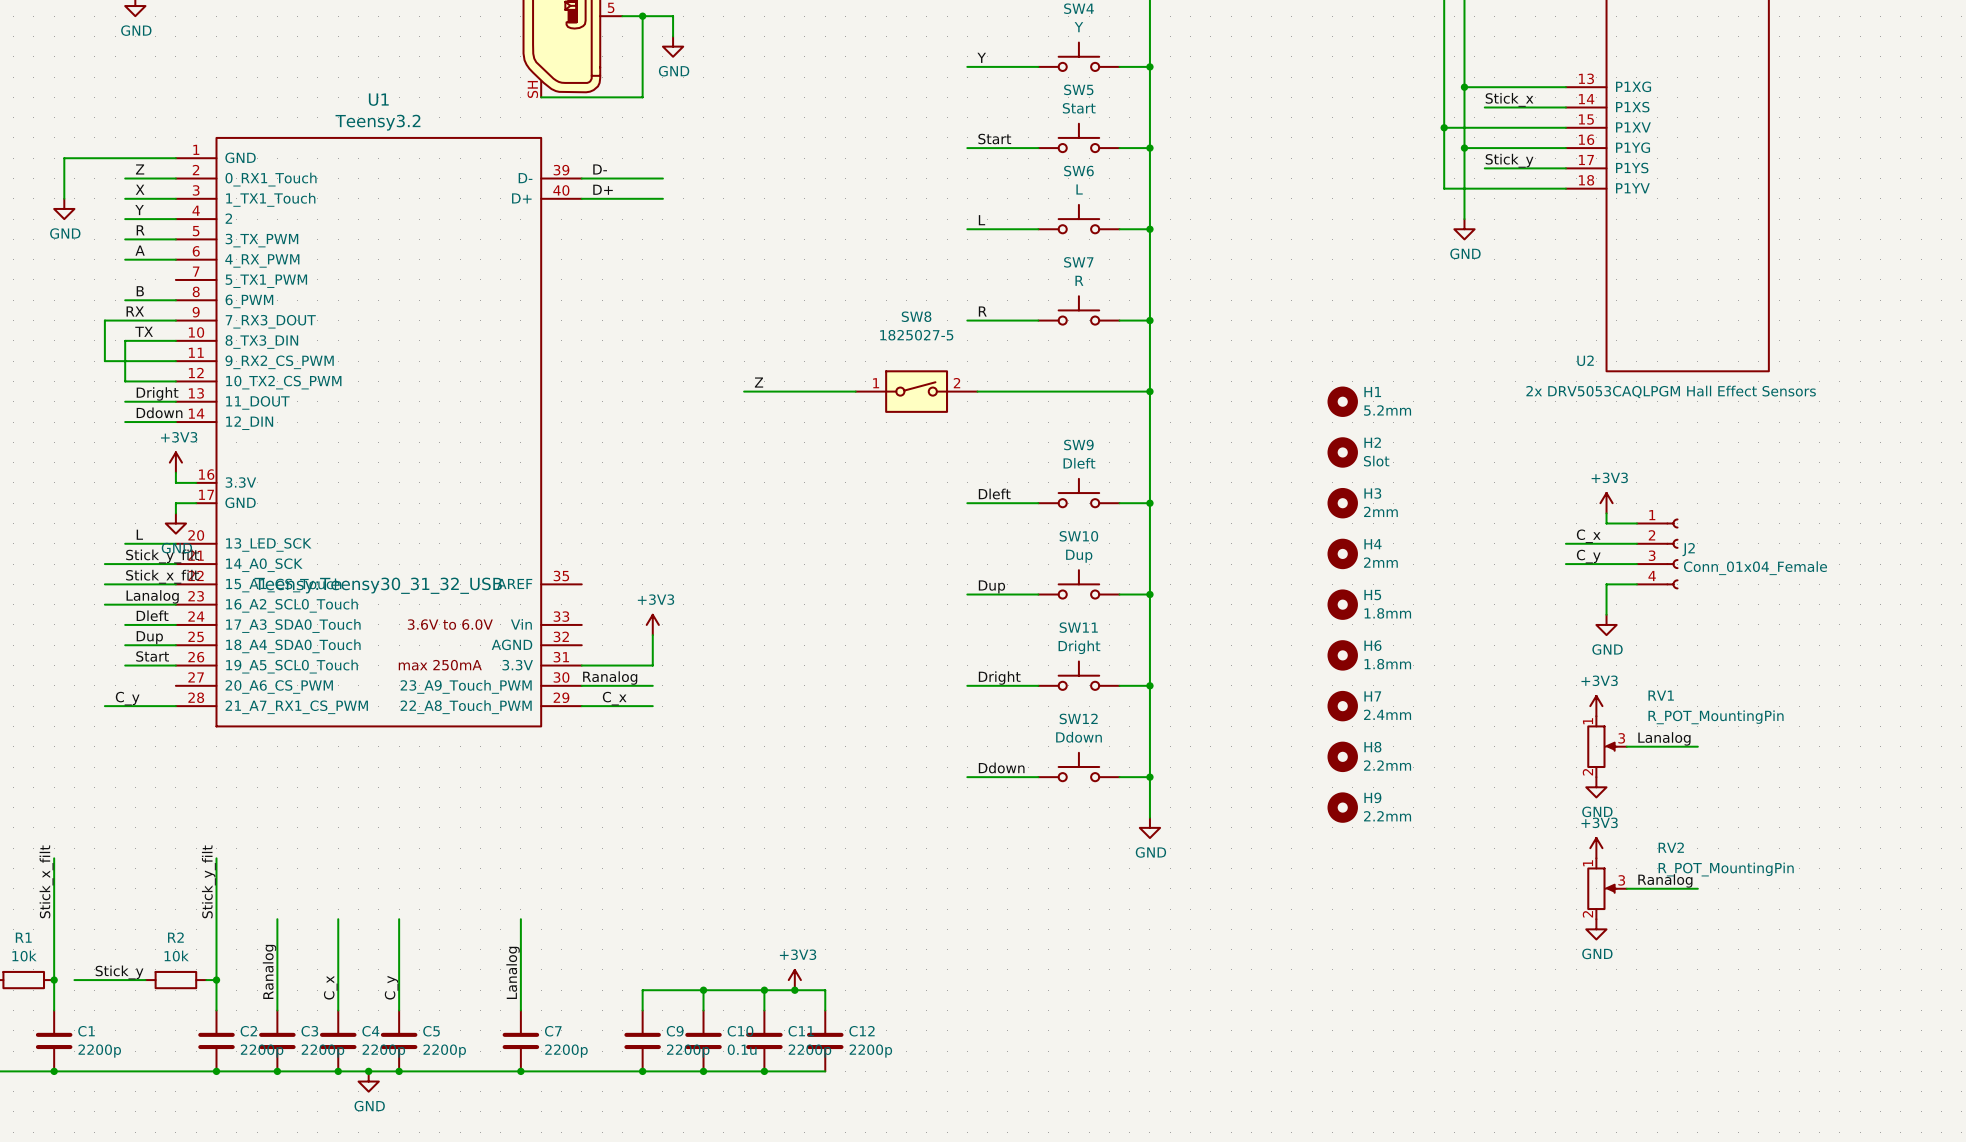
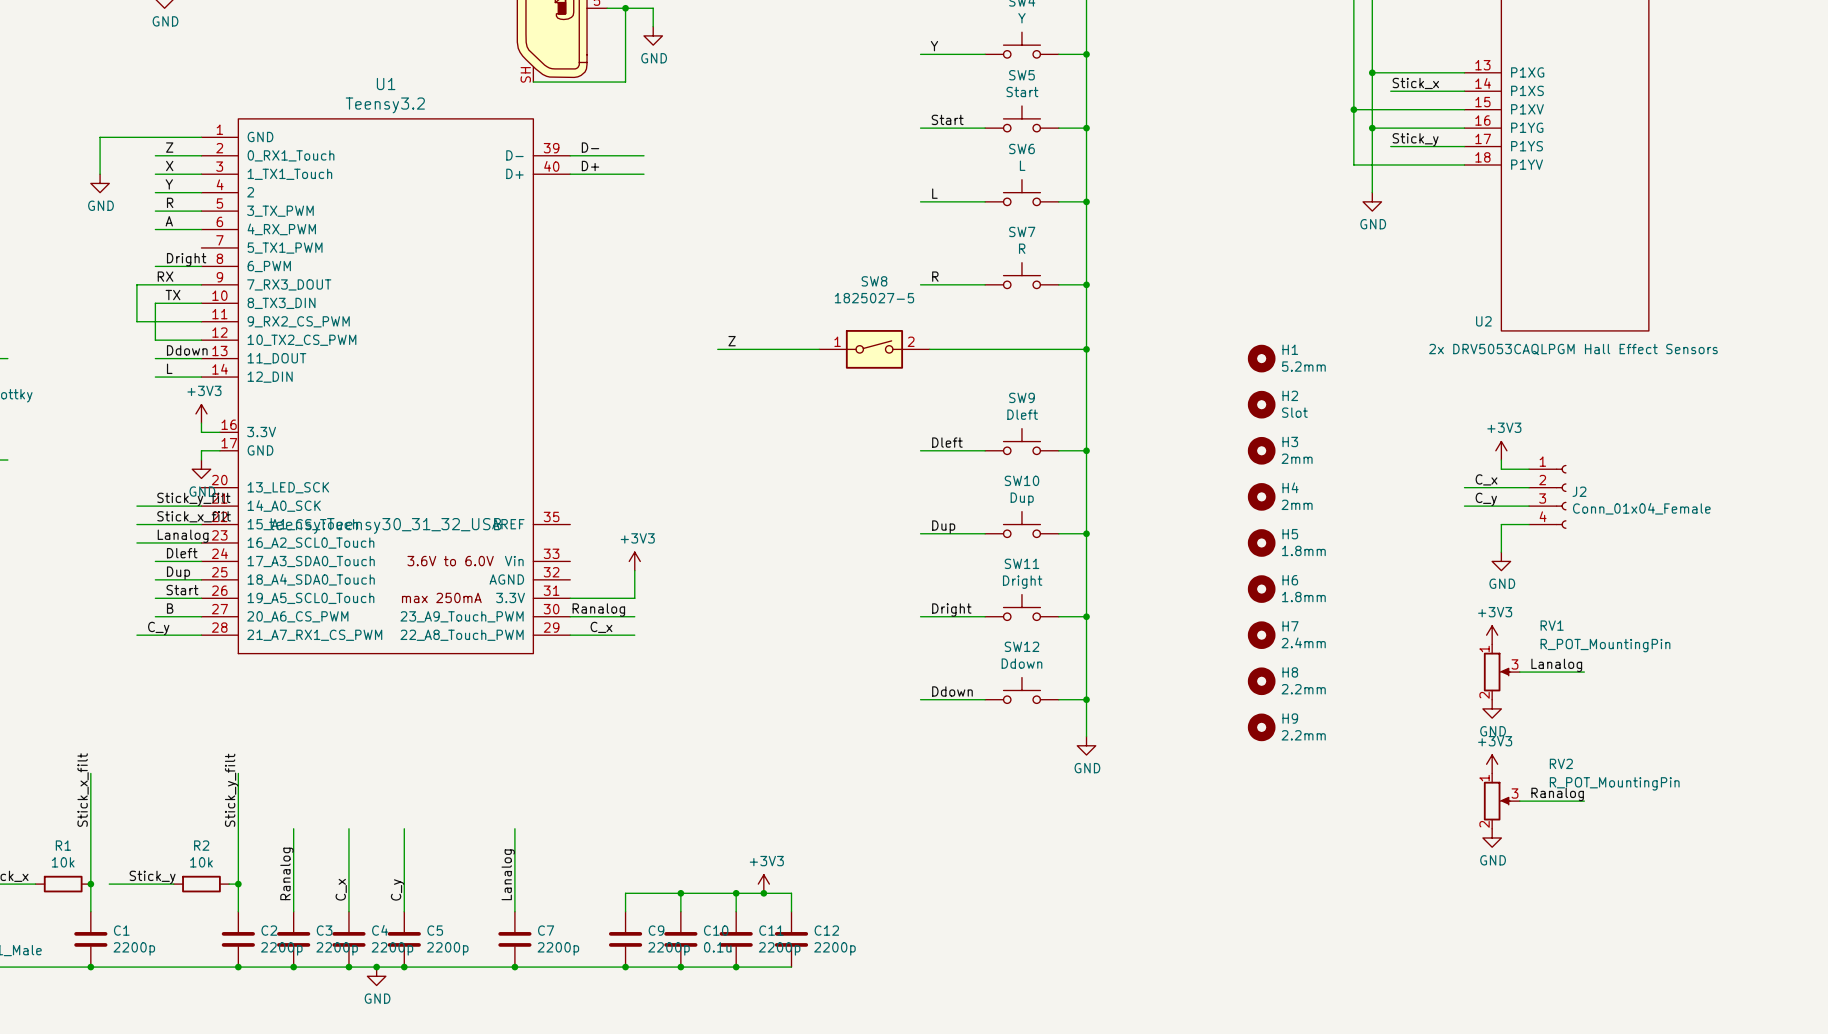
label: B (140, 291) -> Dright (186, 259)
label: Dright (157, 393) -> Ddown (187, 350)
label: Ddown (159, 412) -> L (169, 368)
label: L (139, 534) -> none
wire: (125, 543) (175, 543) -> (155, 616) (201, 616)
U1 text: Teensy:Teensy30_31_32_USB (378, 585) -> teensy:Teensy30_31_32_USB (385, 525)
label: none -> B (170, 608)

